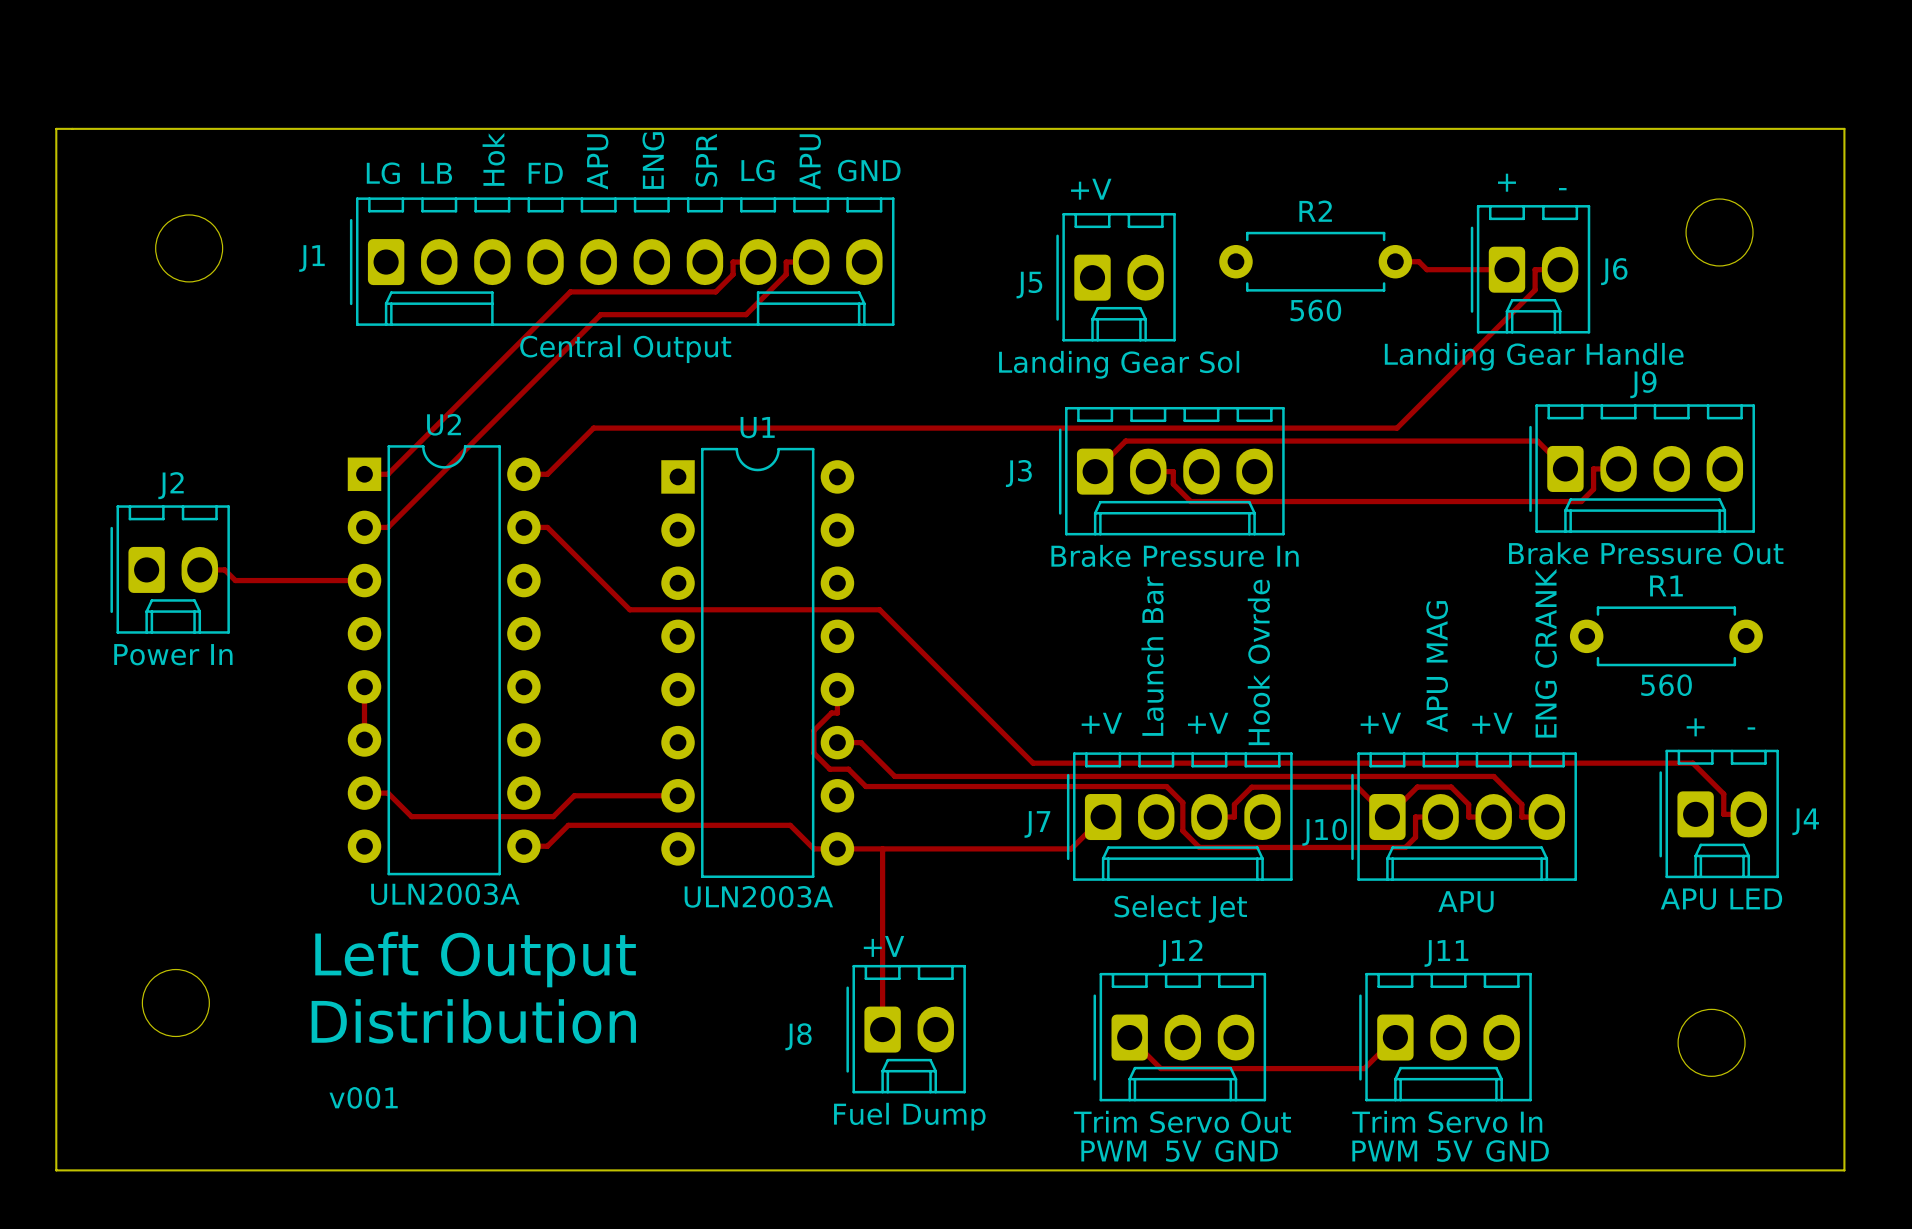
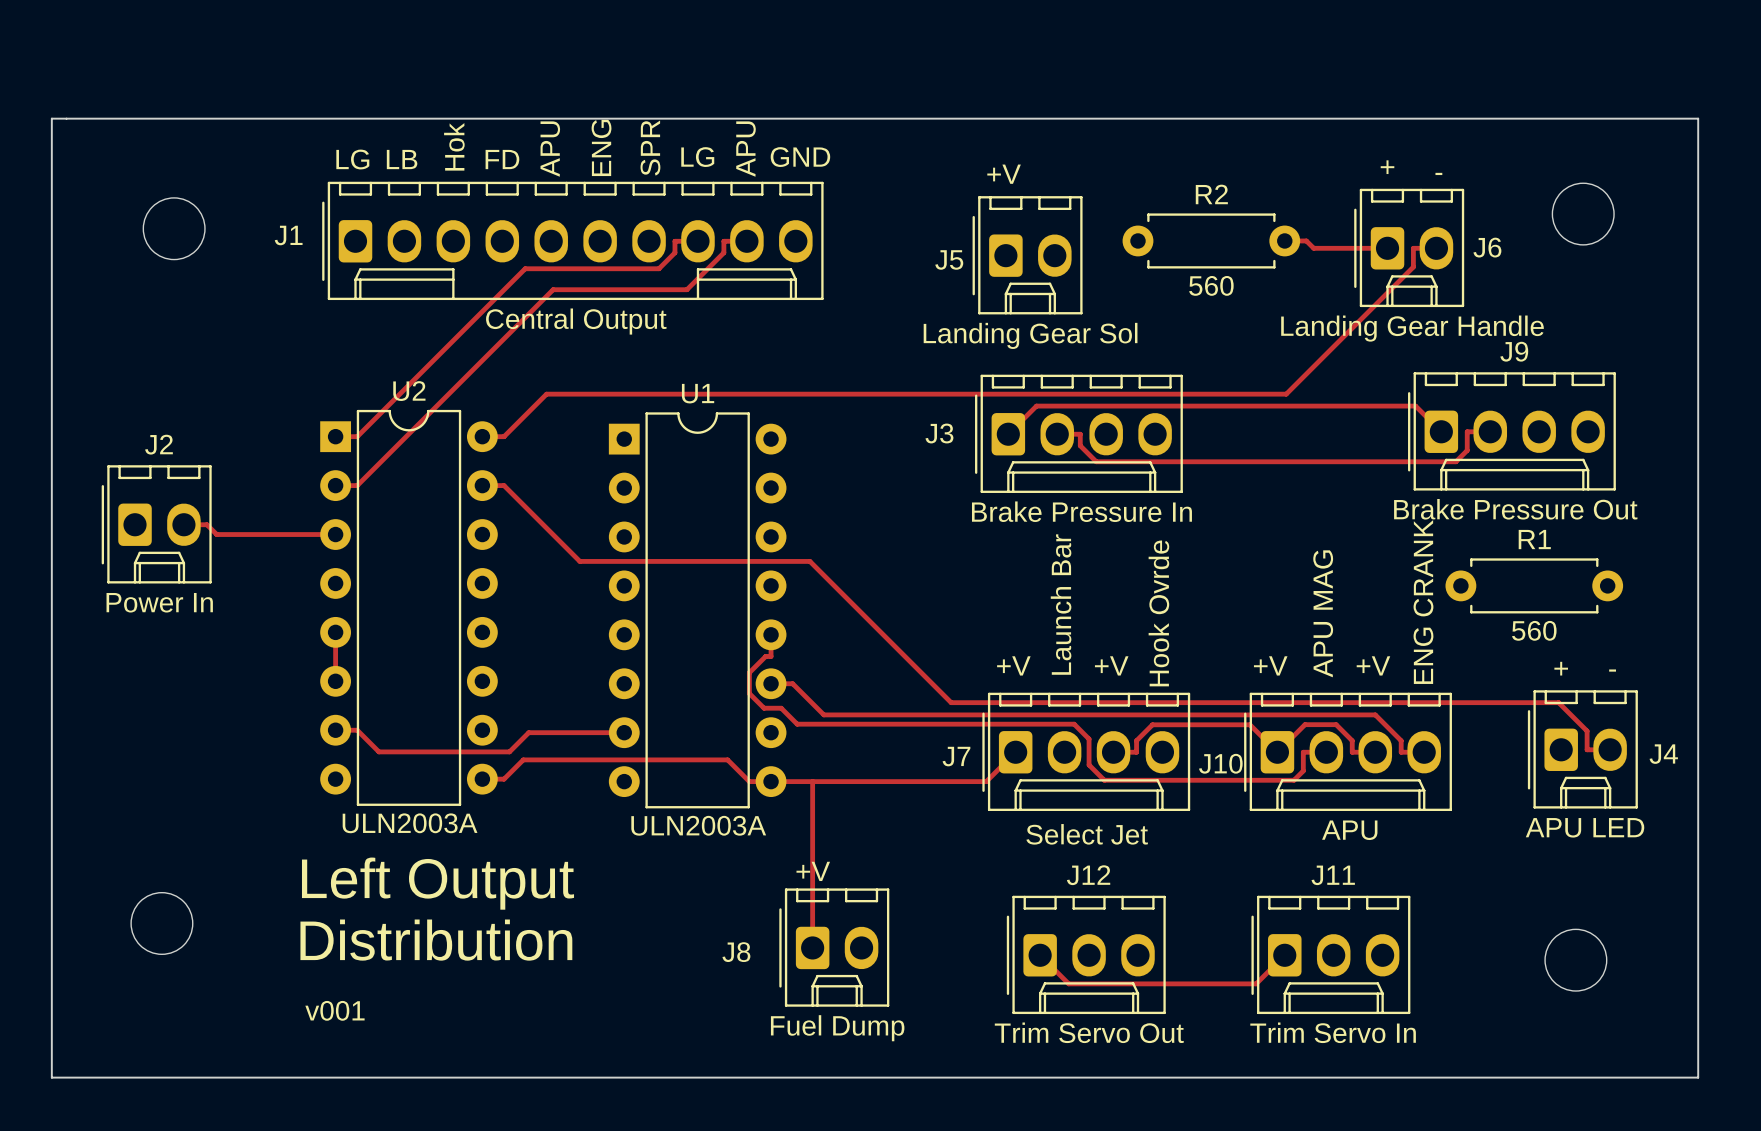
text: PWM (1113, 1151) -> none
text: 5V (1183, 1151) -> none
text: GND (1246, 1151) -> none
text: PWM (1384, 1151) -> none
text: 5V (1454, 1151) -> none
text: GND (1517, 1151) -> none

